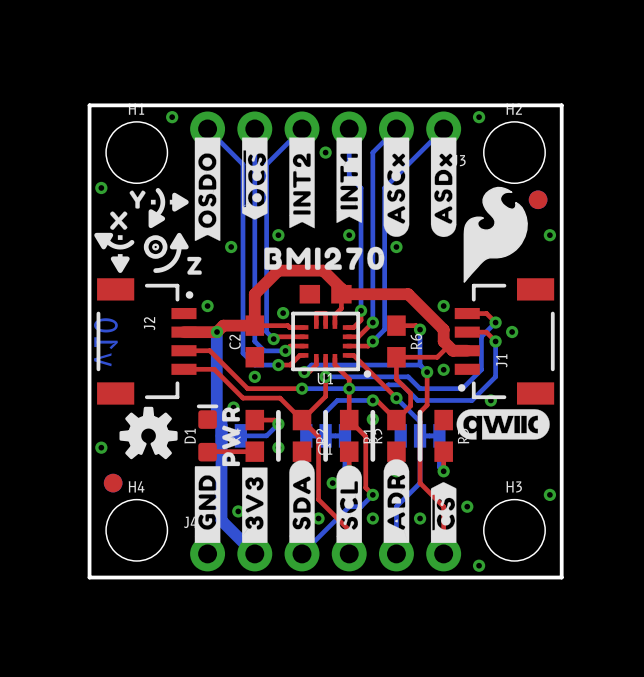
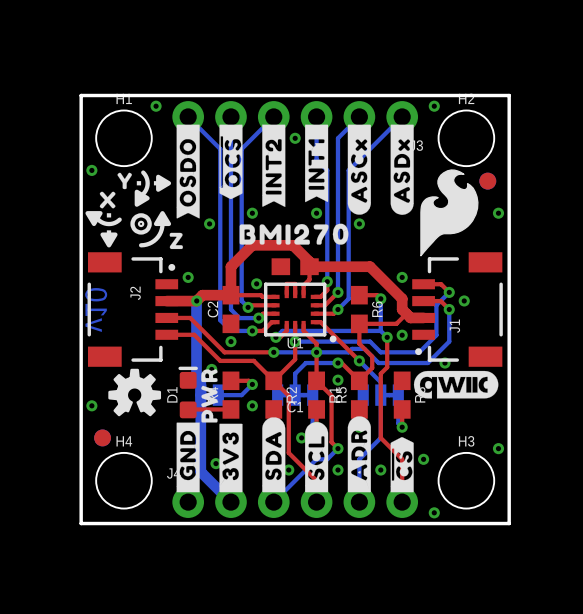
line: (278, 412) (278, 459) -> none
line: (325, 412) (325, 459) -> none
line: (372, 412) (372, 459) -> none
line: (420, 412) (420, 459) -> none

